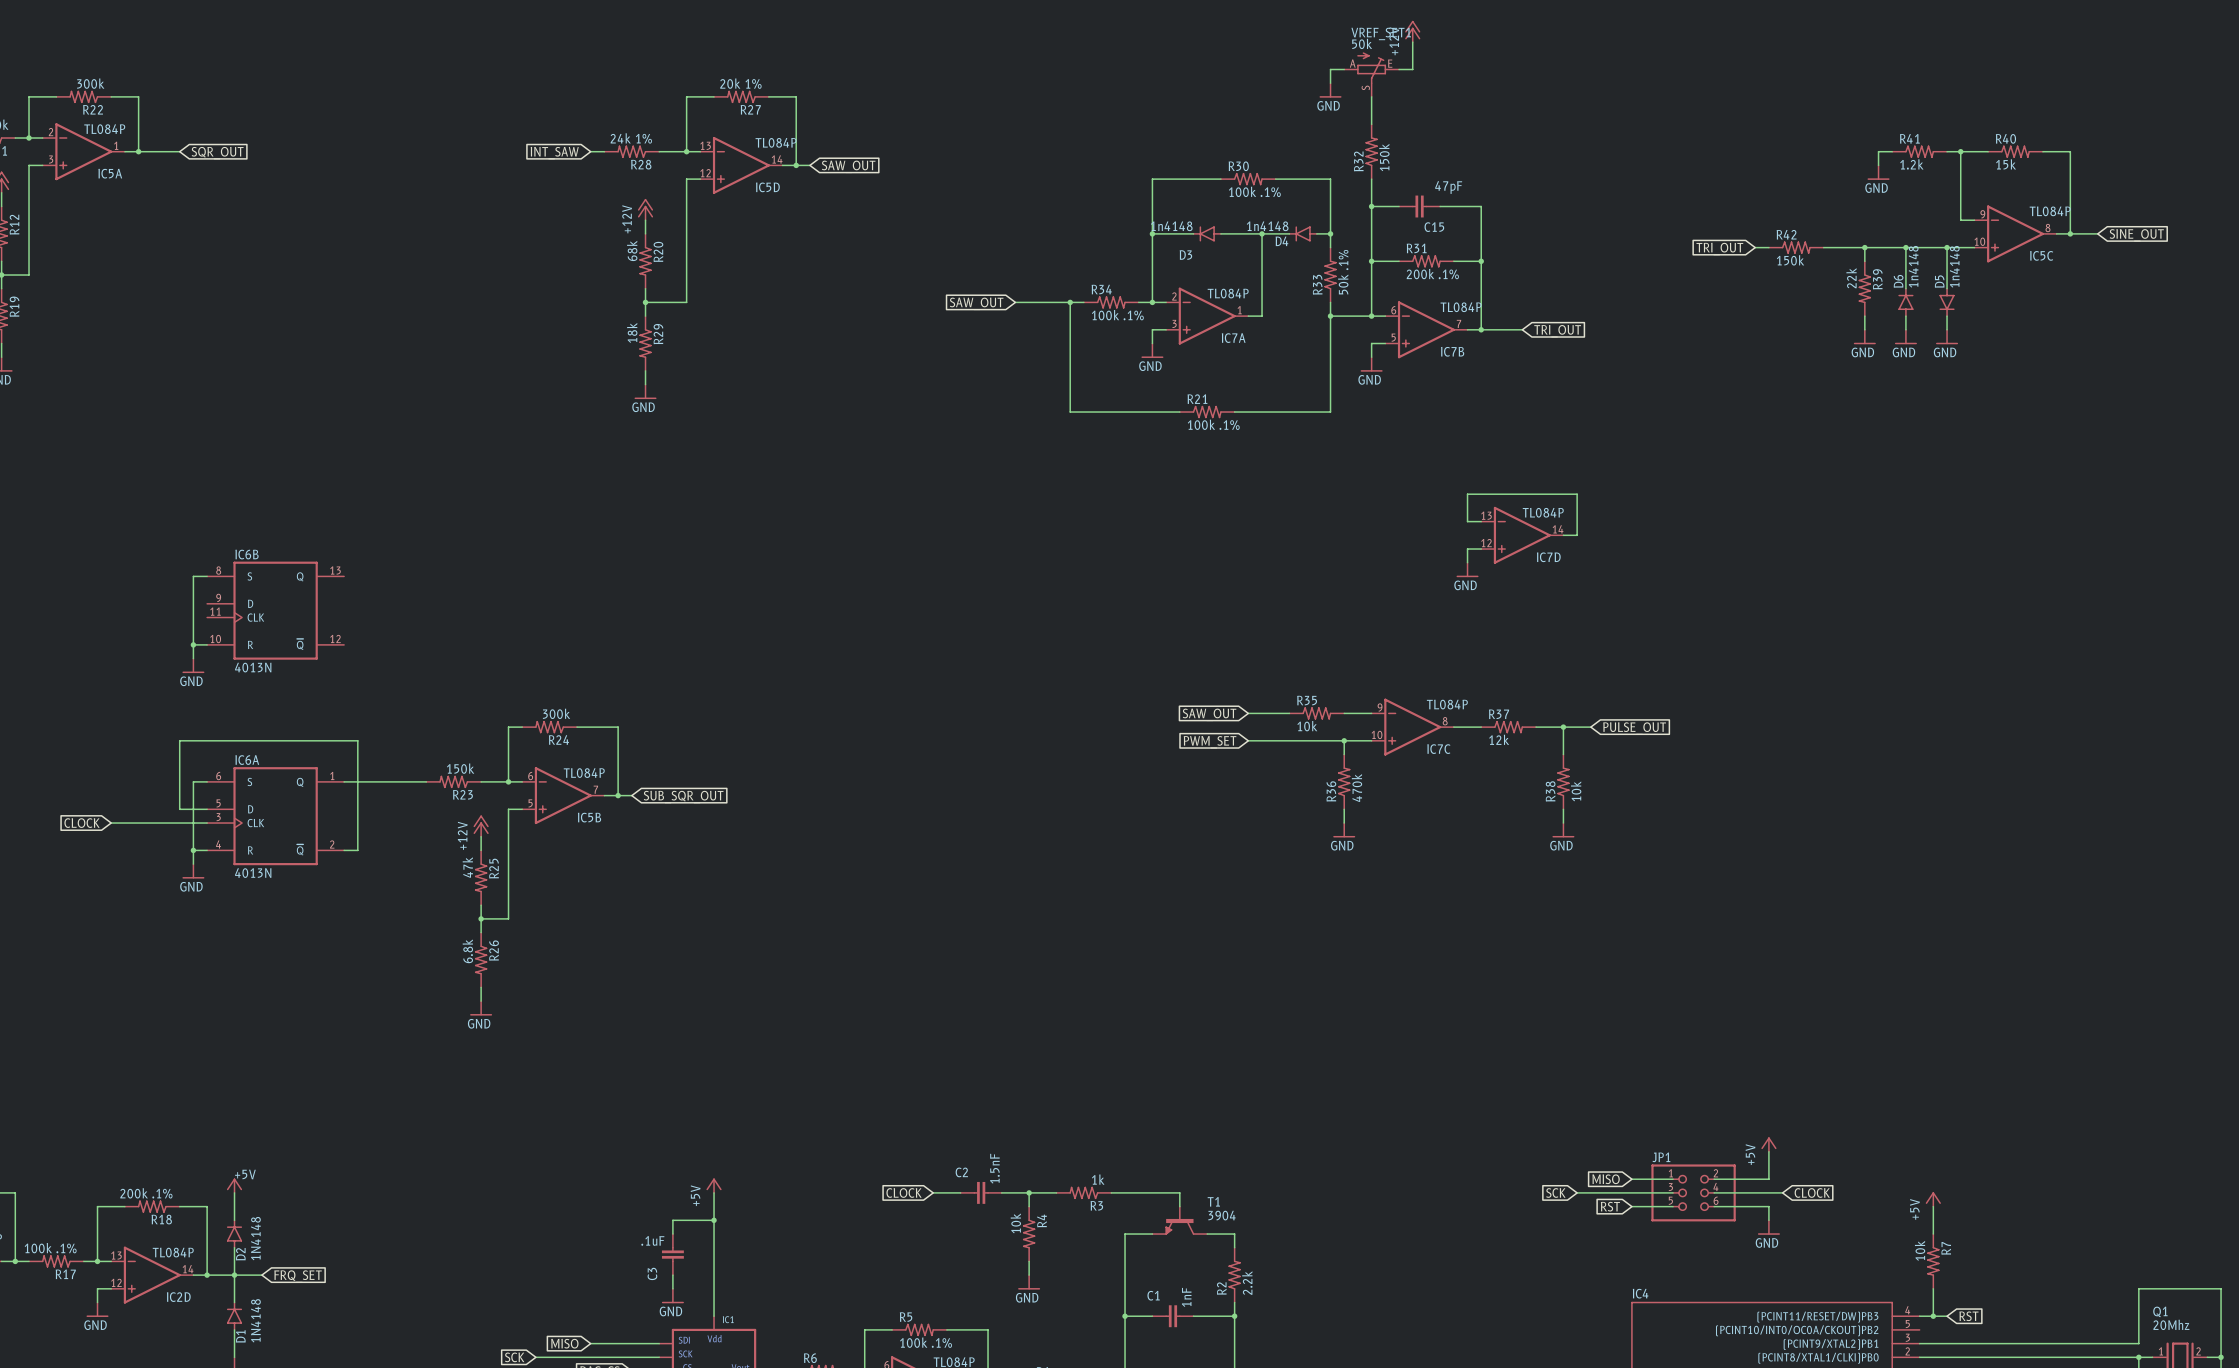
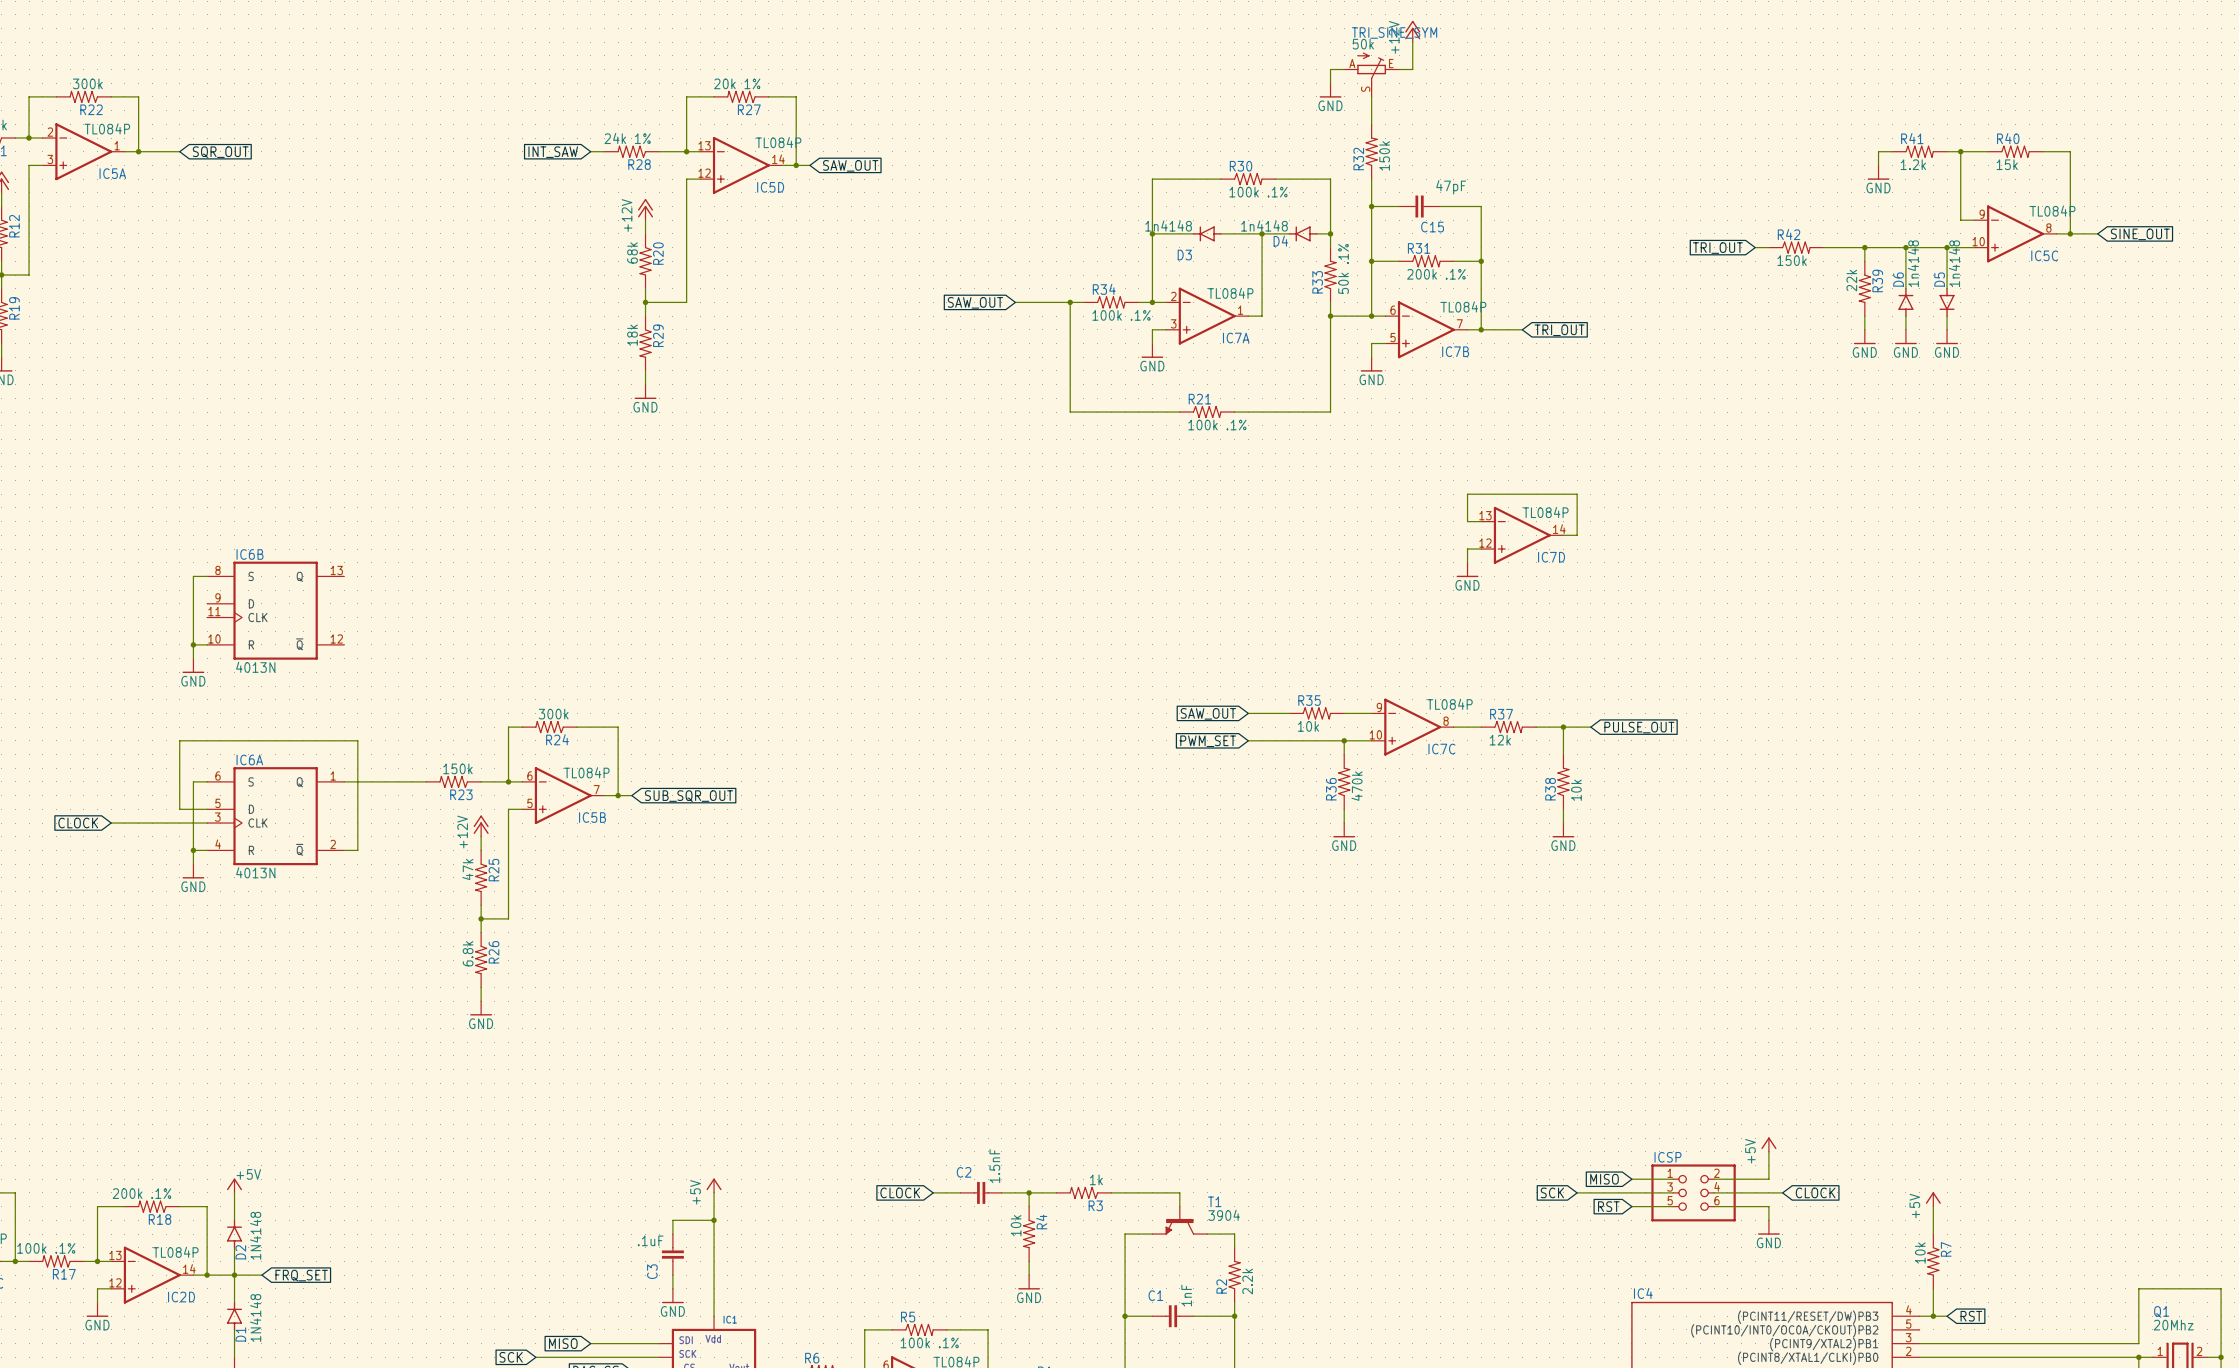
VREF_SET1 name: VREF_SET1 (1381, 33) -> TRI_SINE_SYM (1394, 32)
JP1 name: JP1 (1661, 1157) -> ICSP (1667, 1157)

